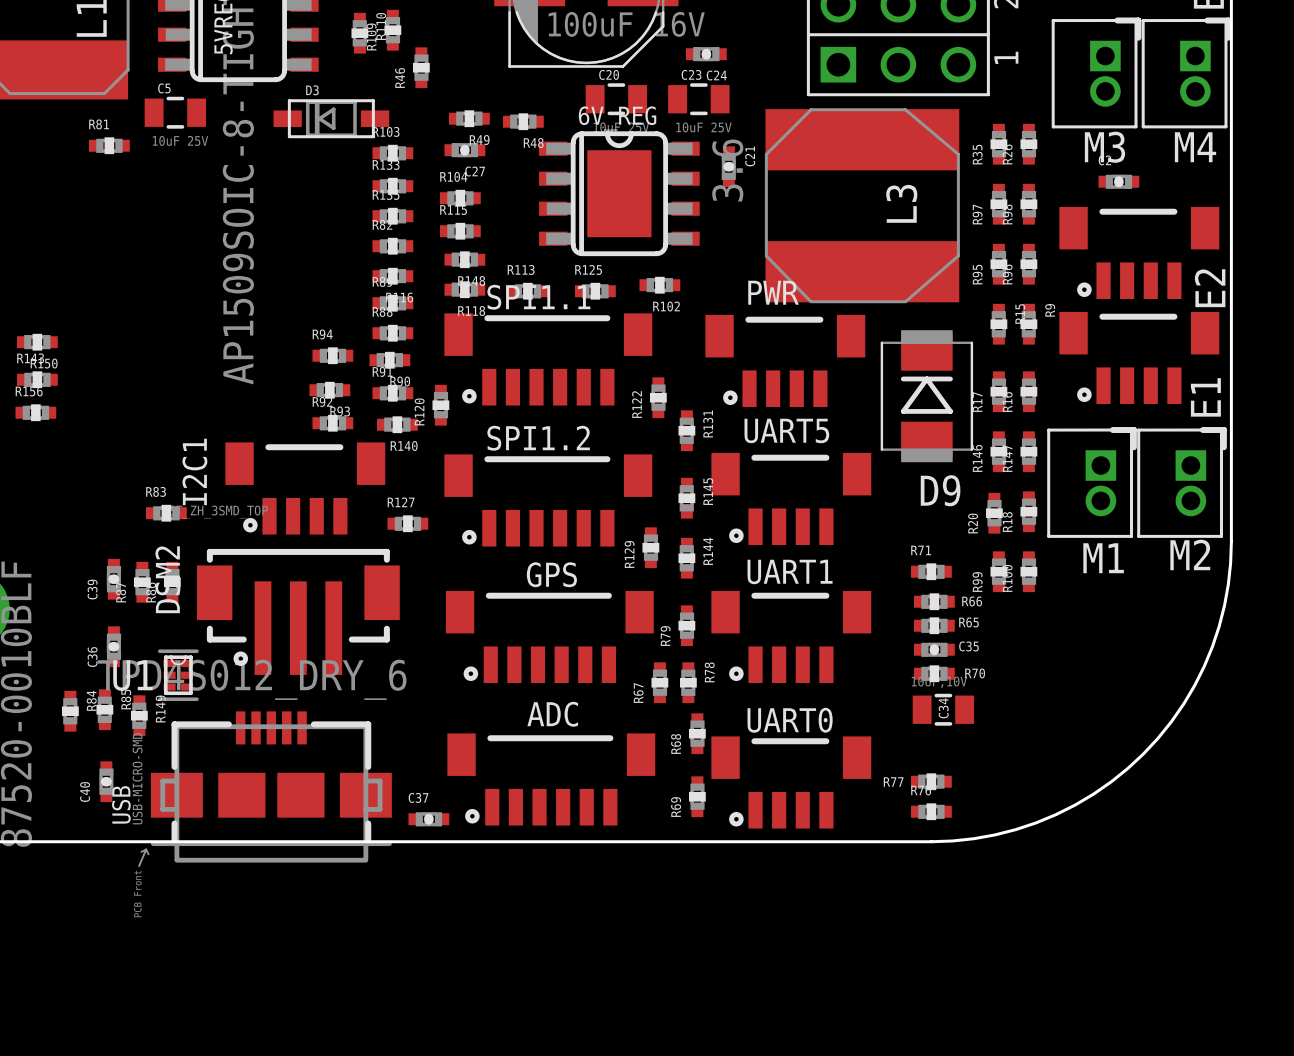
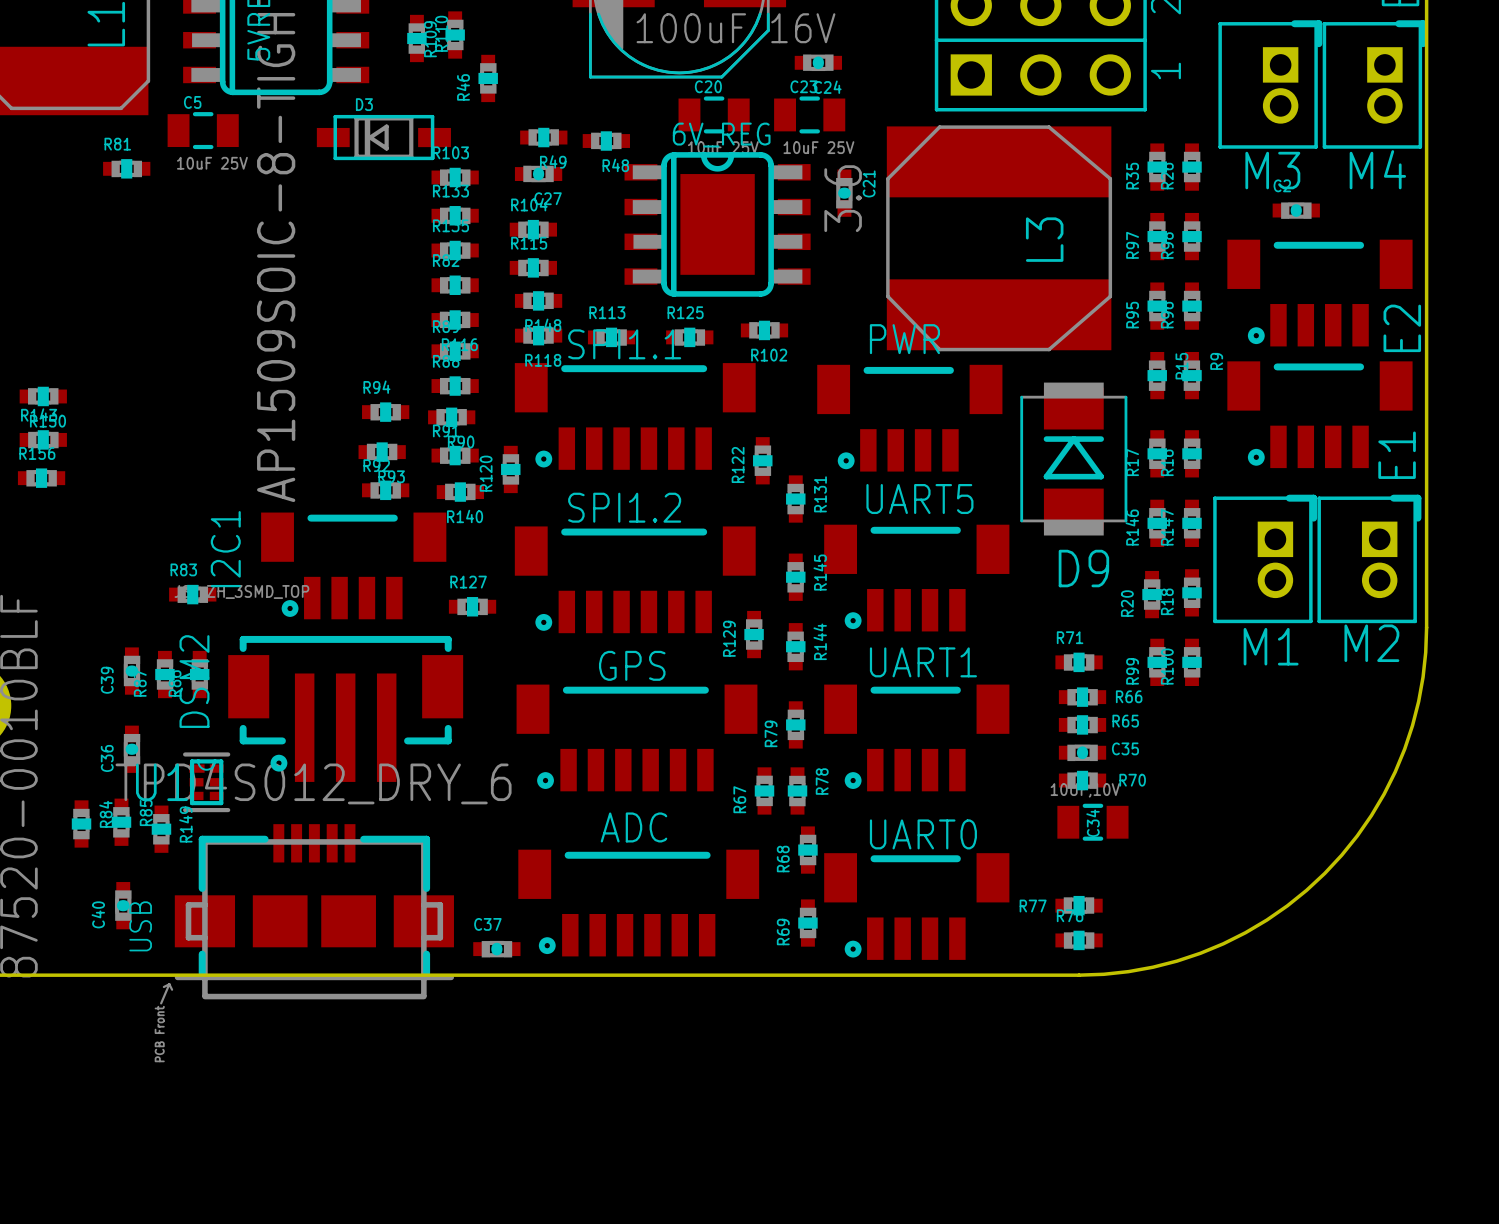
USB value: USB-MICRO-SMD (137, 778) -> none

